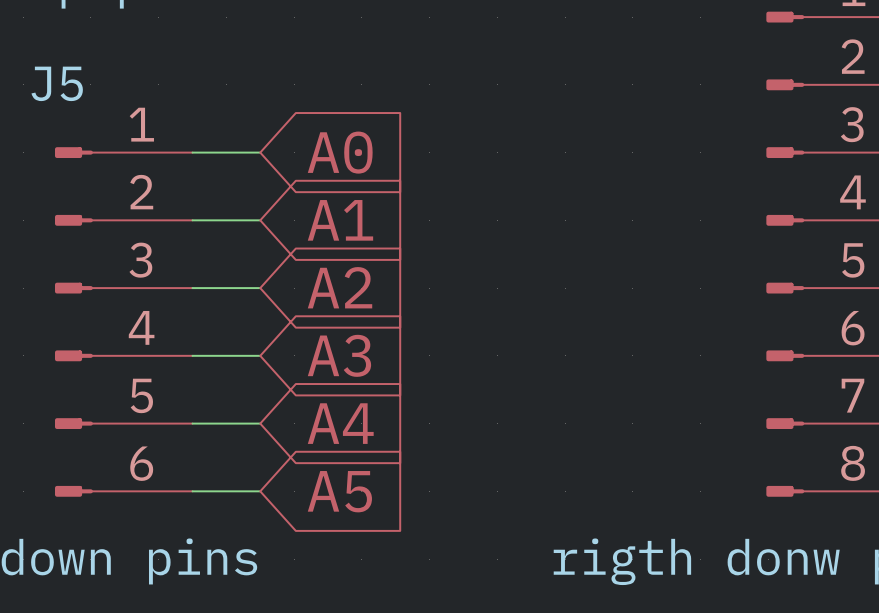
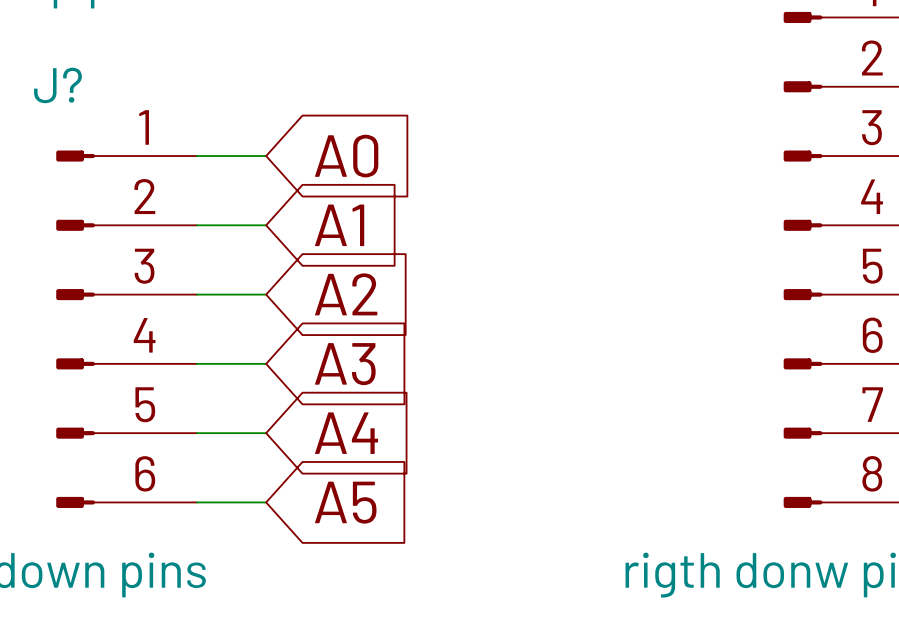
J5 name: J5 (57, 83) -> J? (57, 85)

